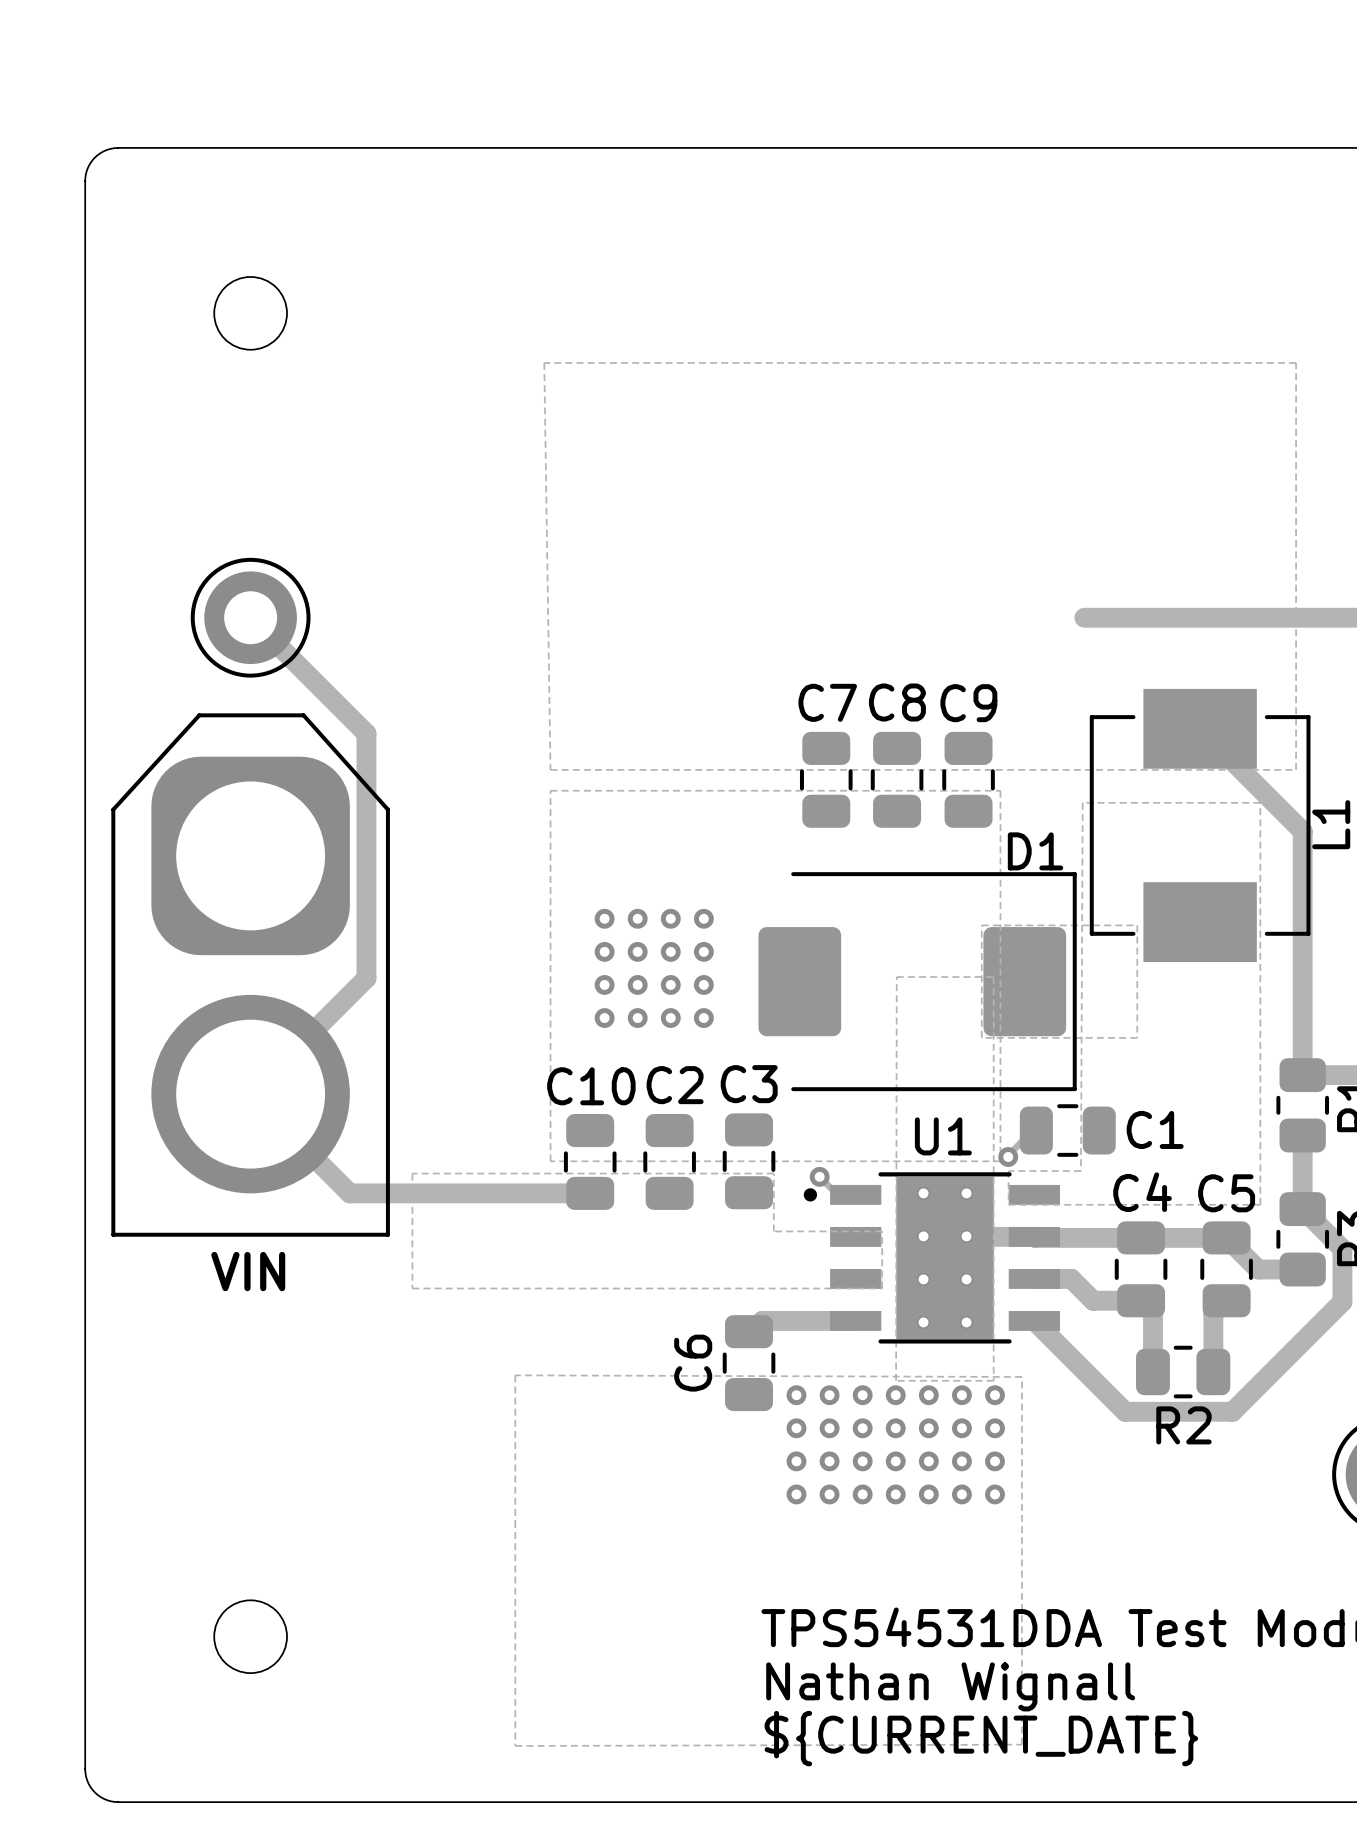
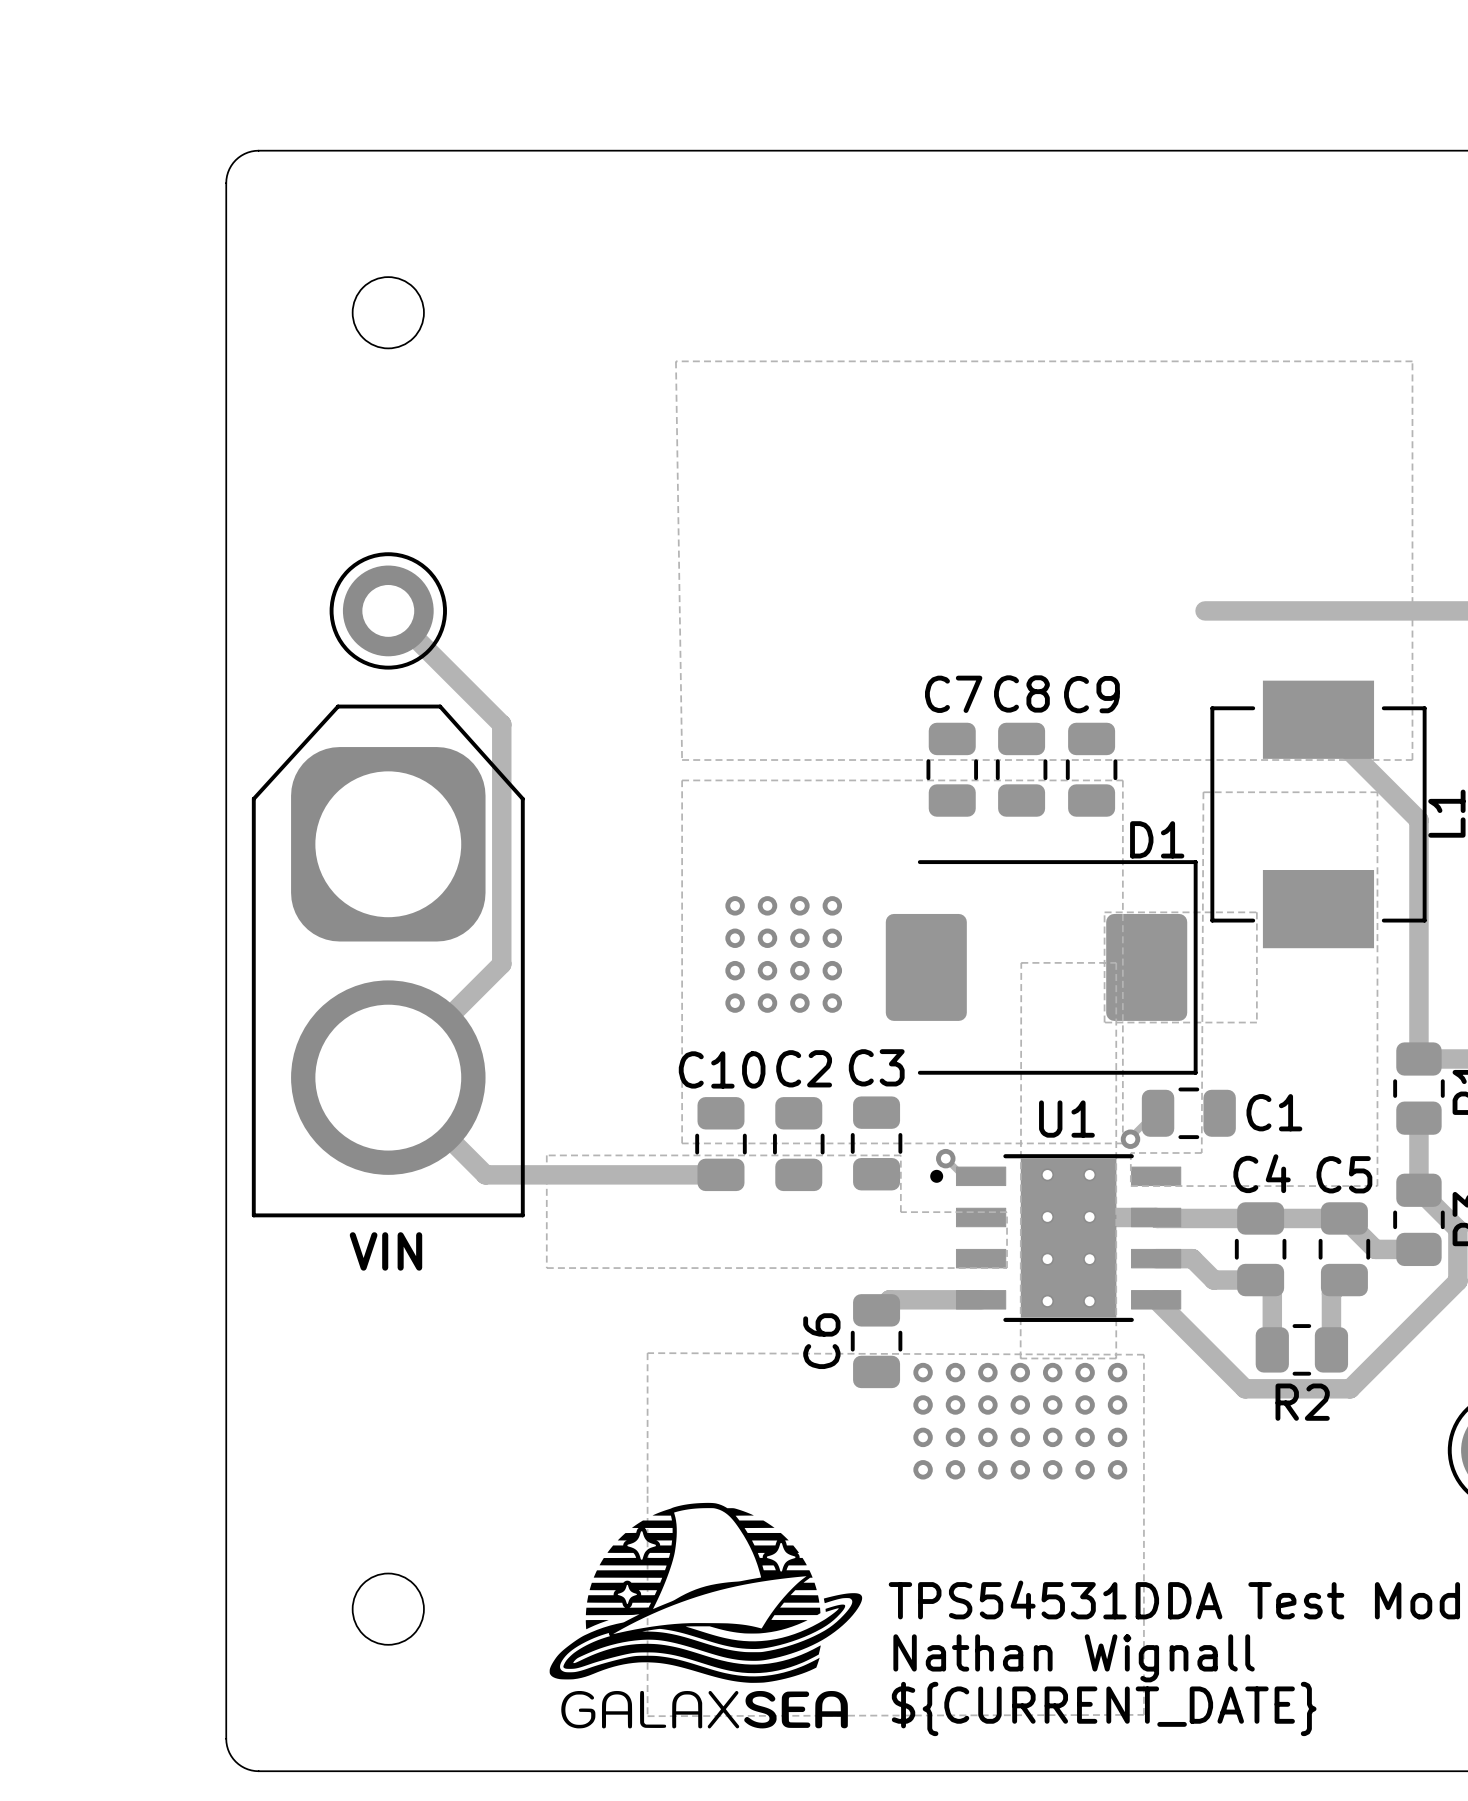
drawing: none -> [549, 1502, 863, 1729]

